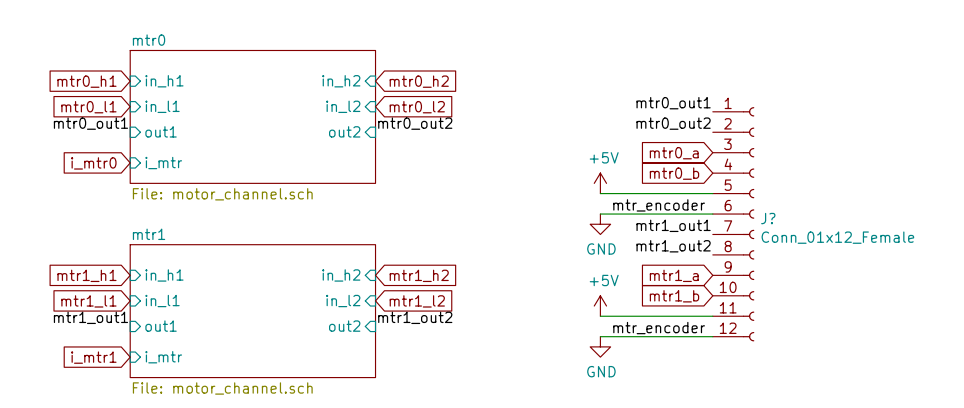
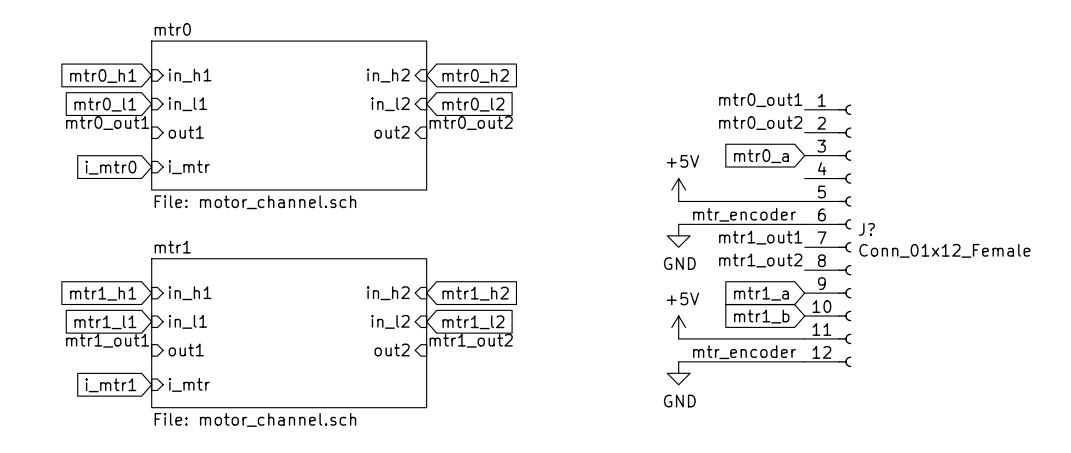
global label: mtr0_b (674, 173) -> none

